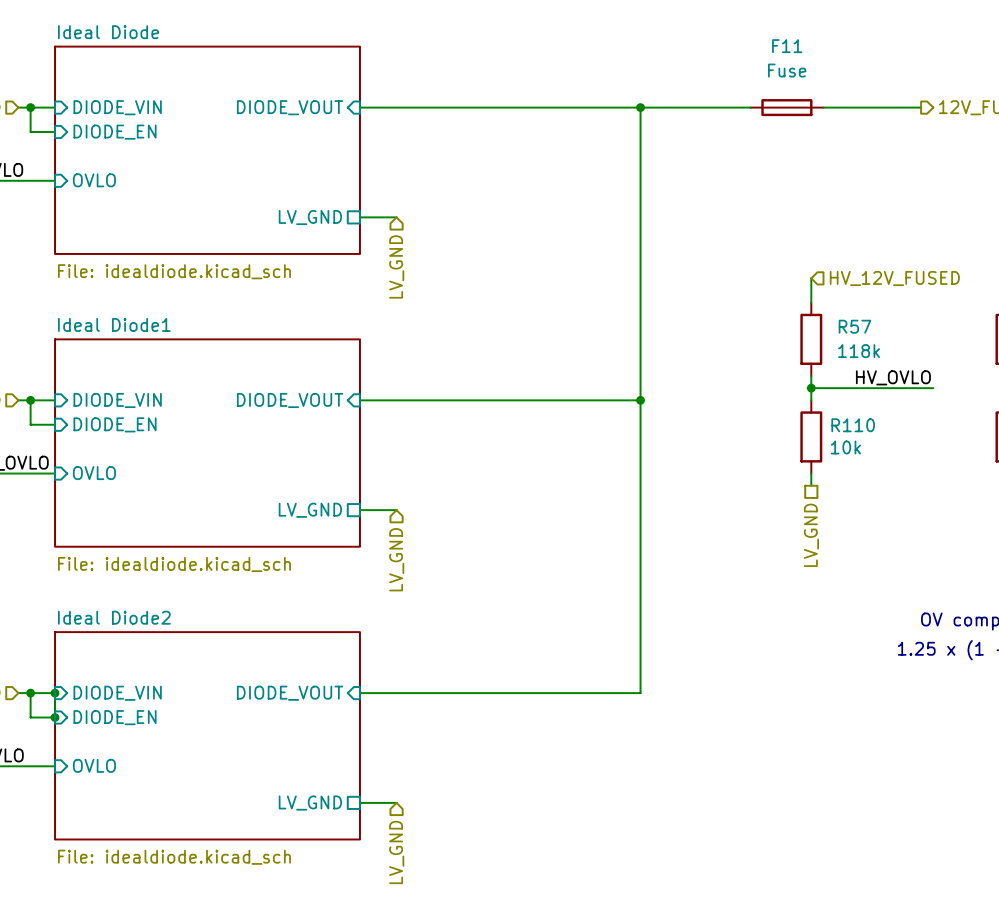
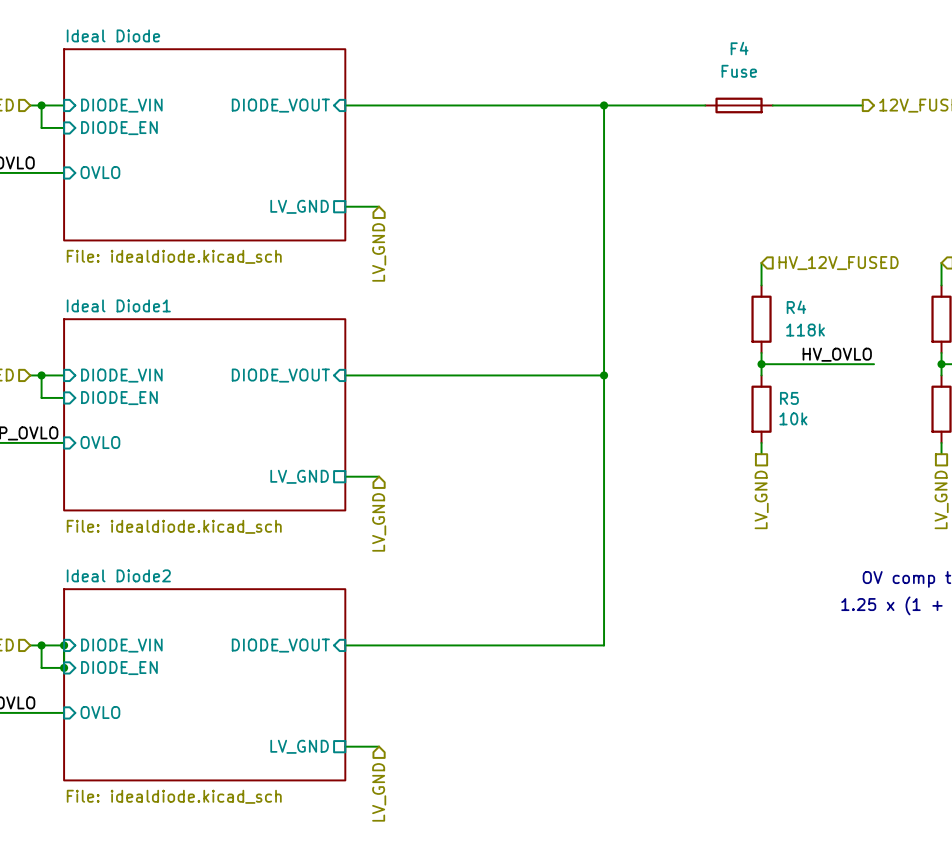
F11 name: F11 (787, 46) -> F4 (739, 48)
R57 name: R57 (854, 326) -> R4 (796, 307)
R110 name: R110 (853, 425) -> R5 (789, 398)

